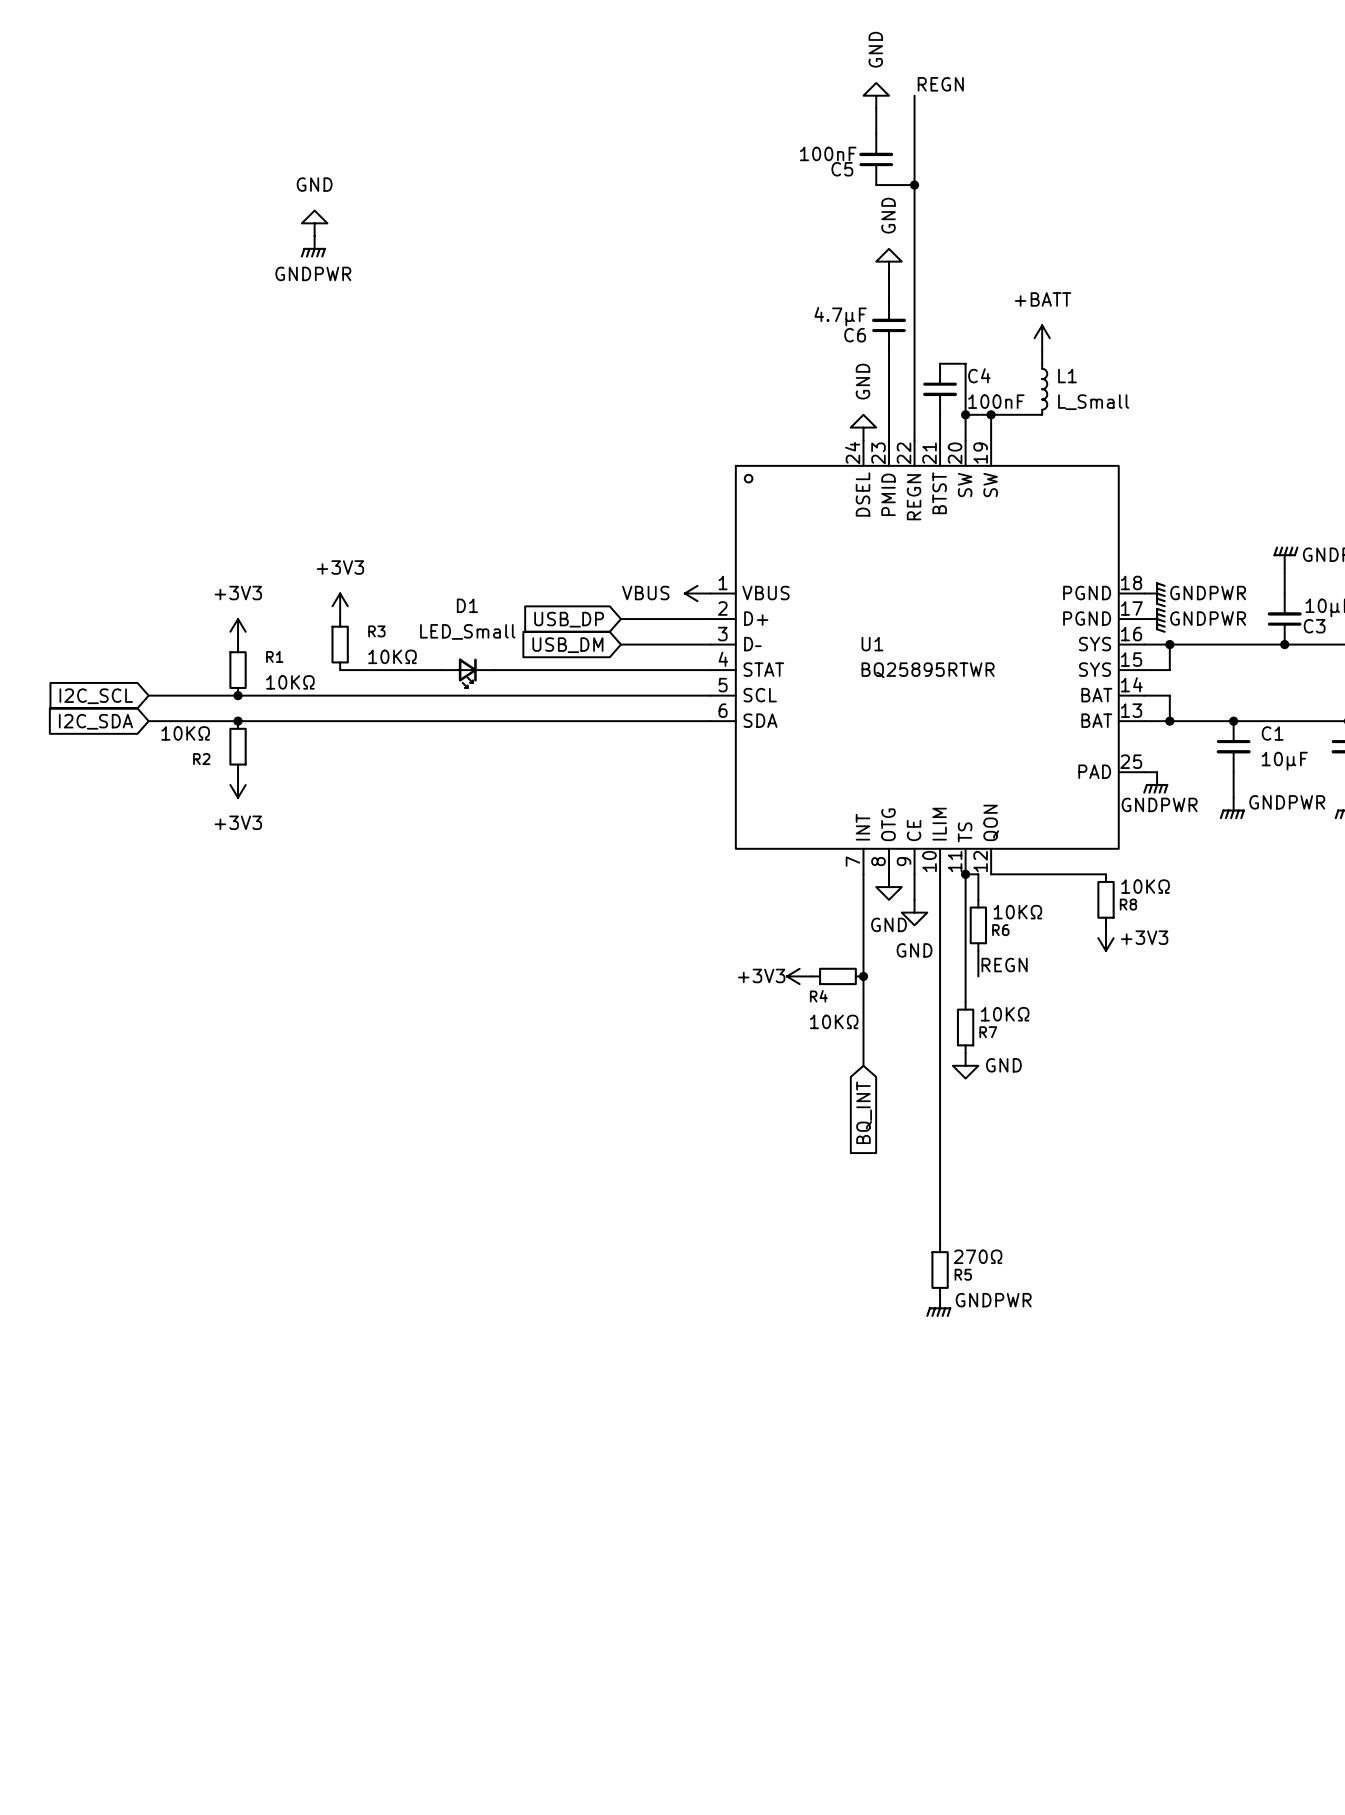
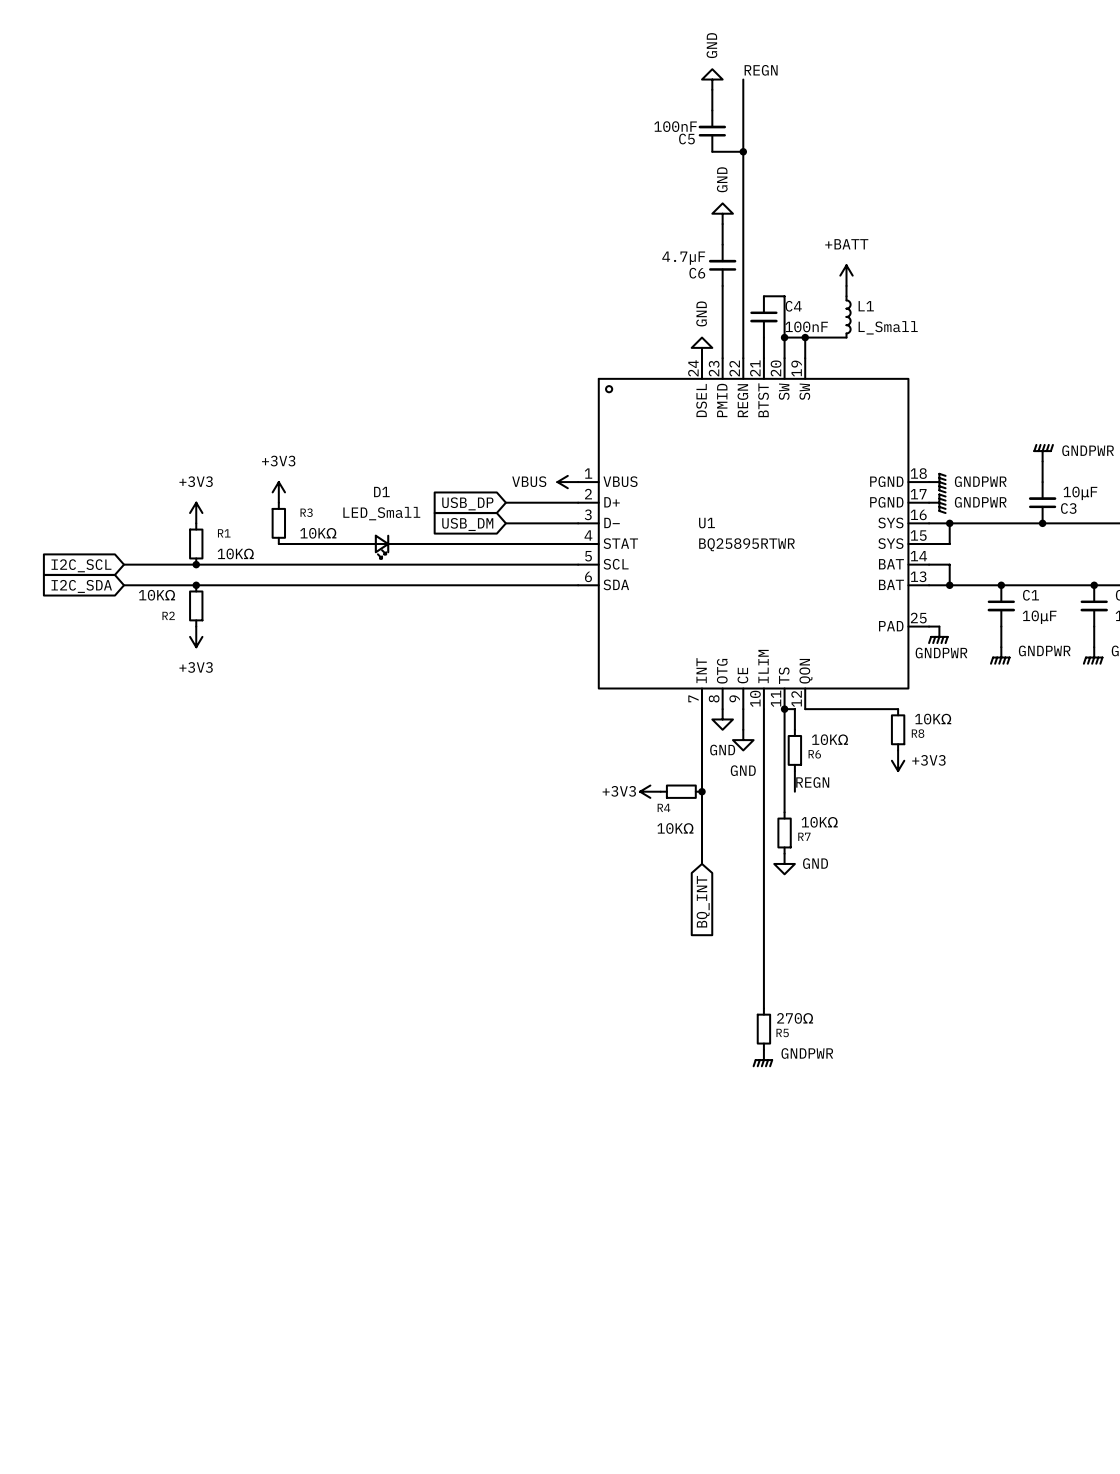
power symbol: GND (314, 223) -> none
power symbol: GNDPWR (313, 246) -> none

